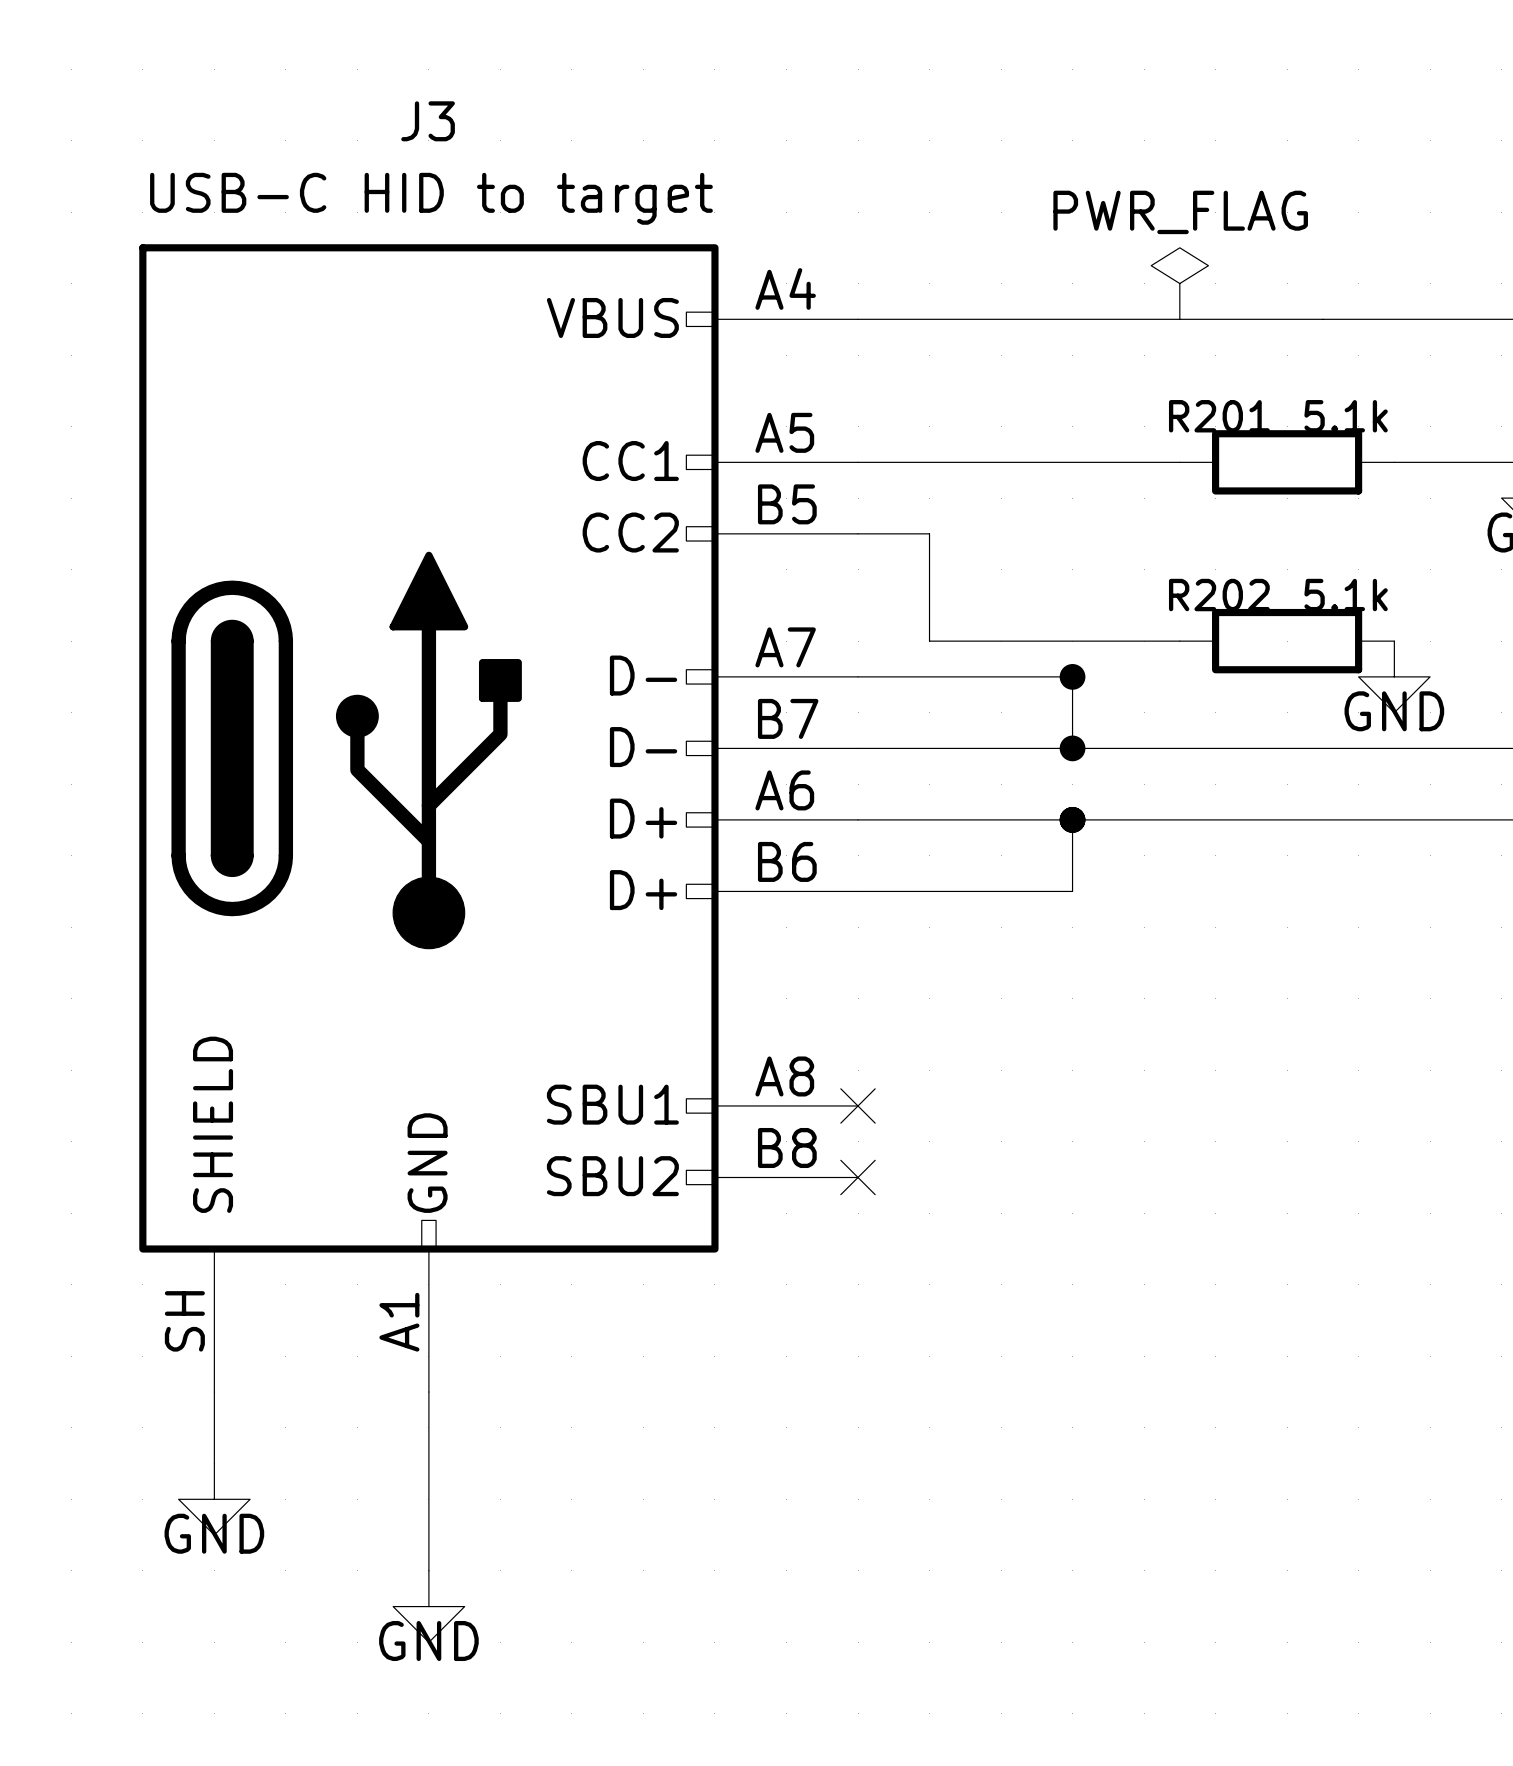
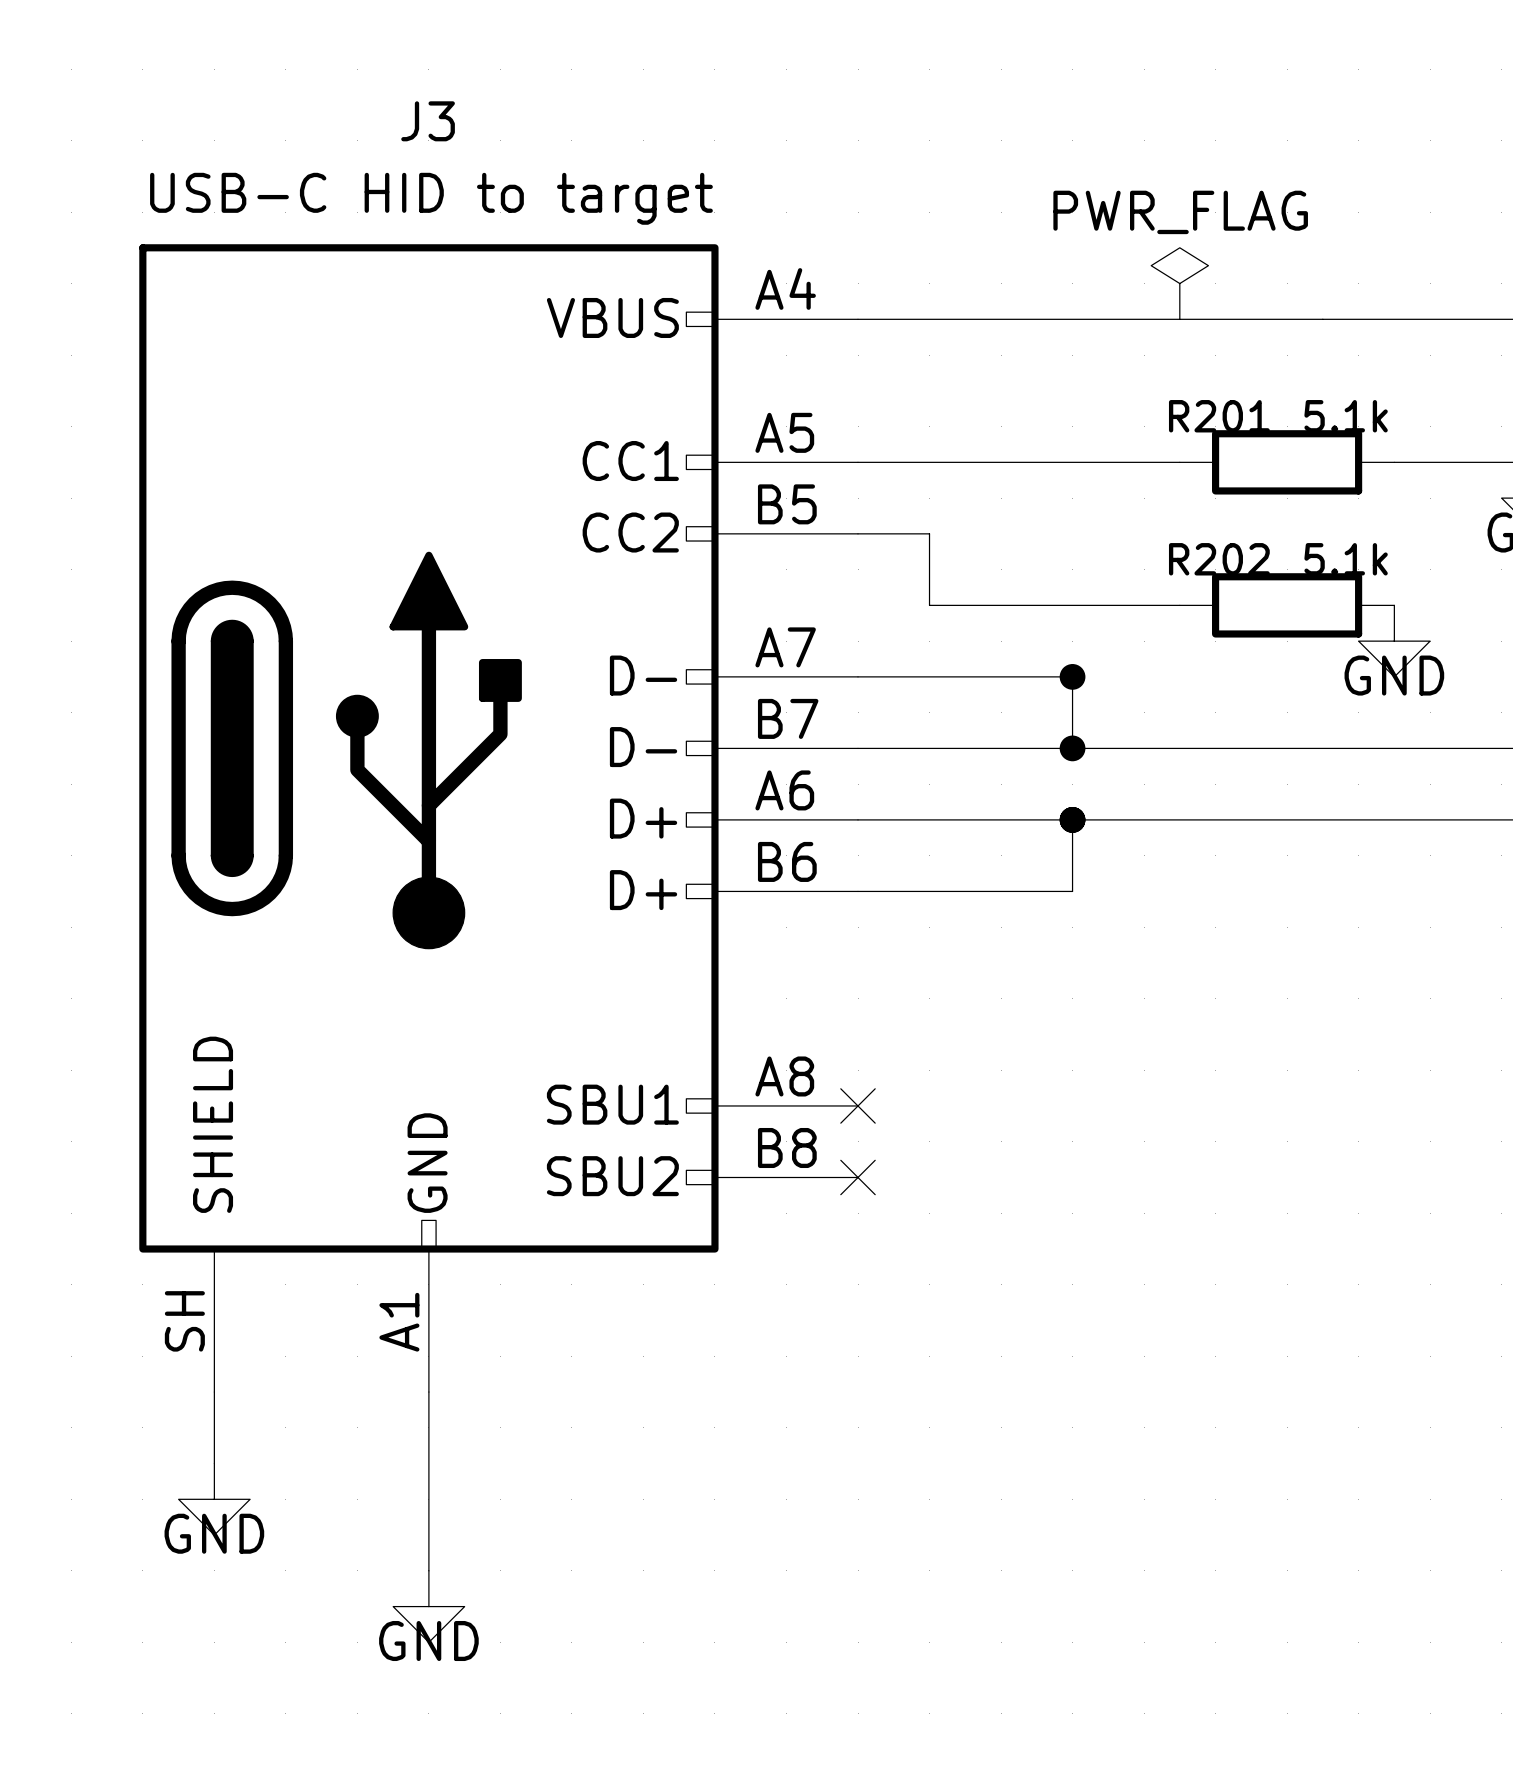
wire: (929, 605) (929, 641) (1179, 641) -> (929, 605) (1179, 605)
R202 position: (1287, 641) -> (1287, 605)
power symbol position: GND (1394, 676) -> GND (1394, 641)

